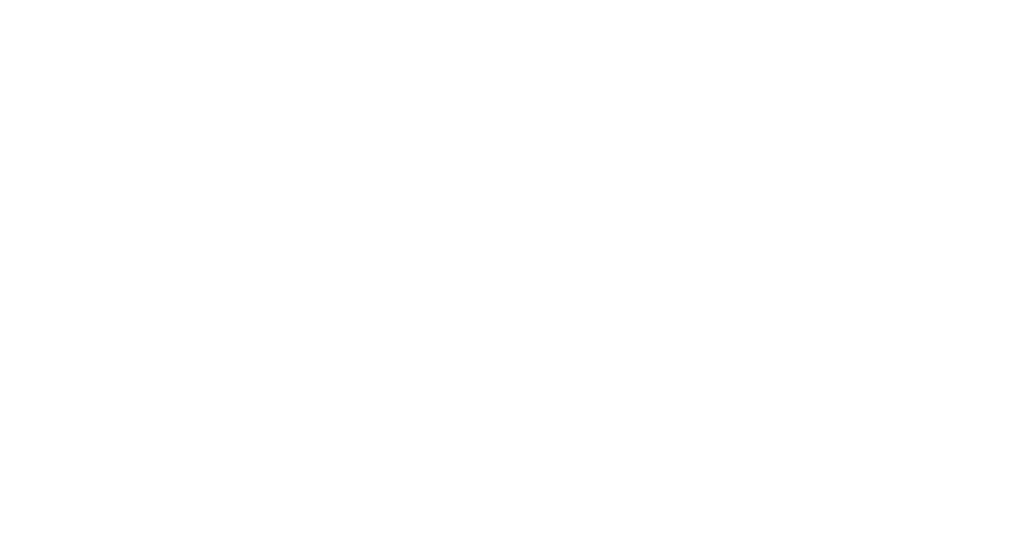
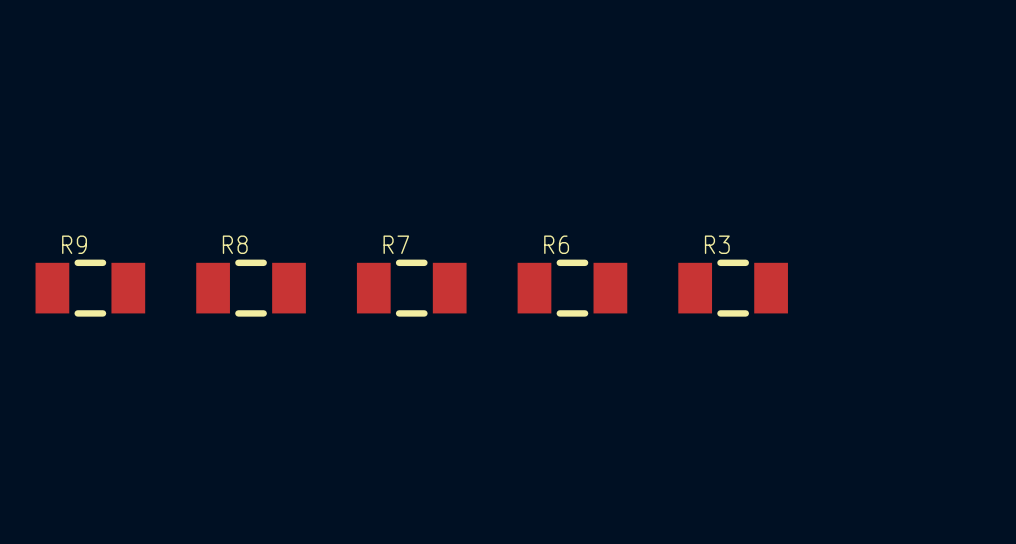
R9: none -> (90, 288)
R8: none -> (251, 288)
R7: none -> (411, 288)
R6: none -> (572, 288)
R3: none -> (733, 288)

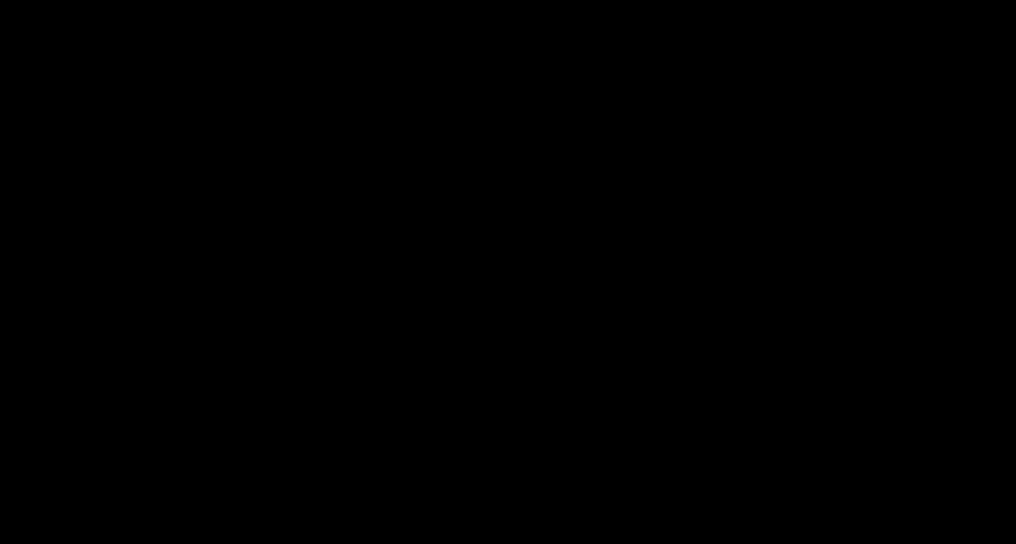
R9: (90, 288) -> none
R8: (251, 288) -> none
R7: (411, 288) -> none
R6: (572, 288) -> none
R3: (733, 288) -> none

